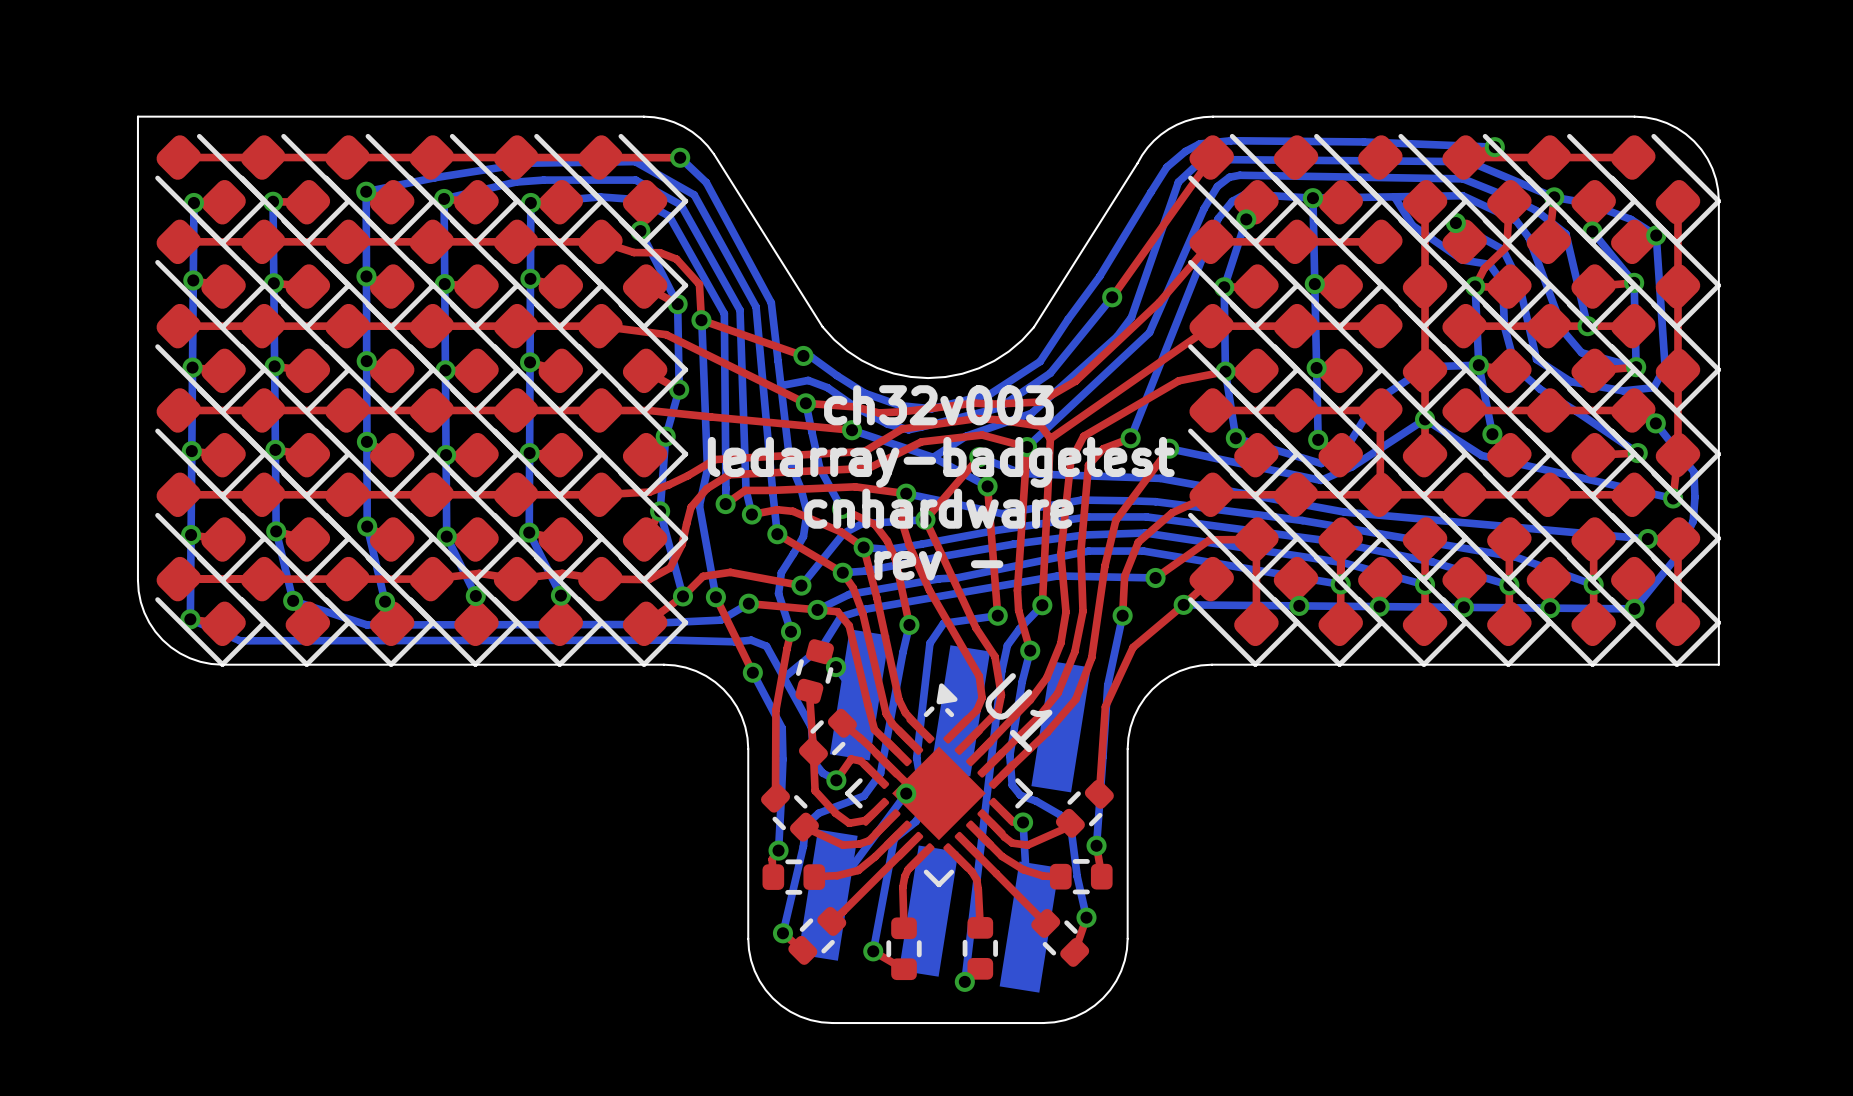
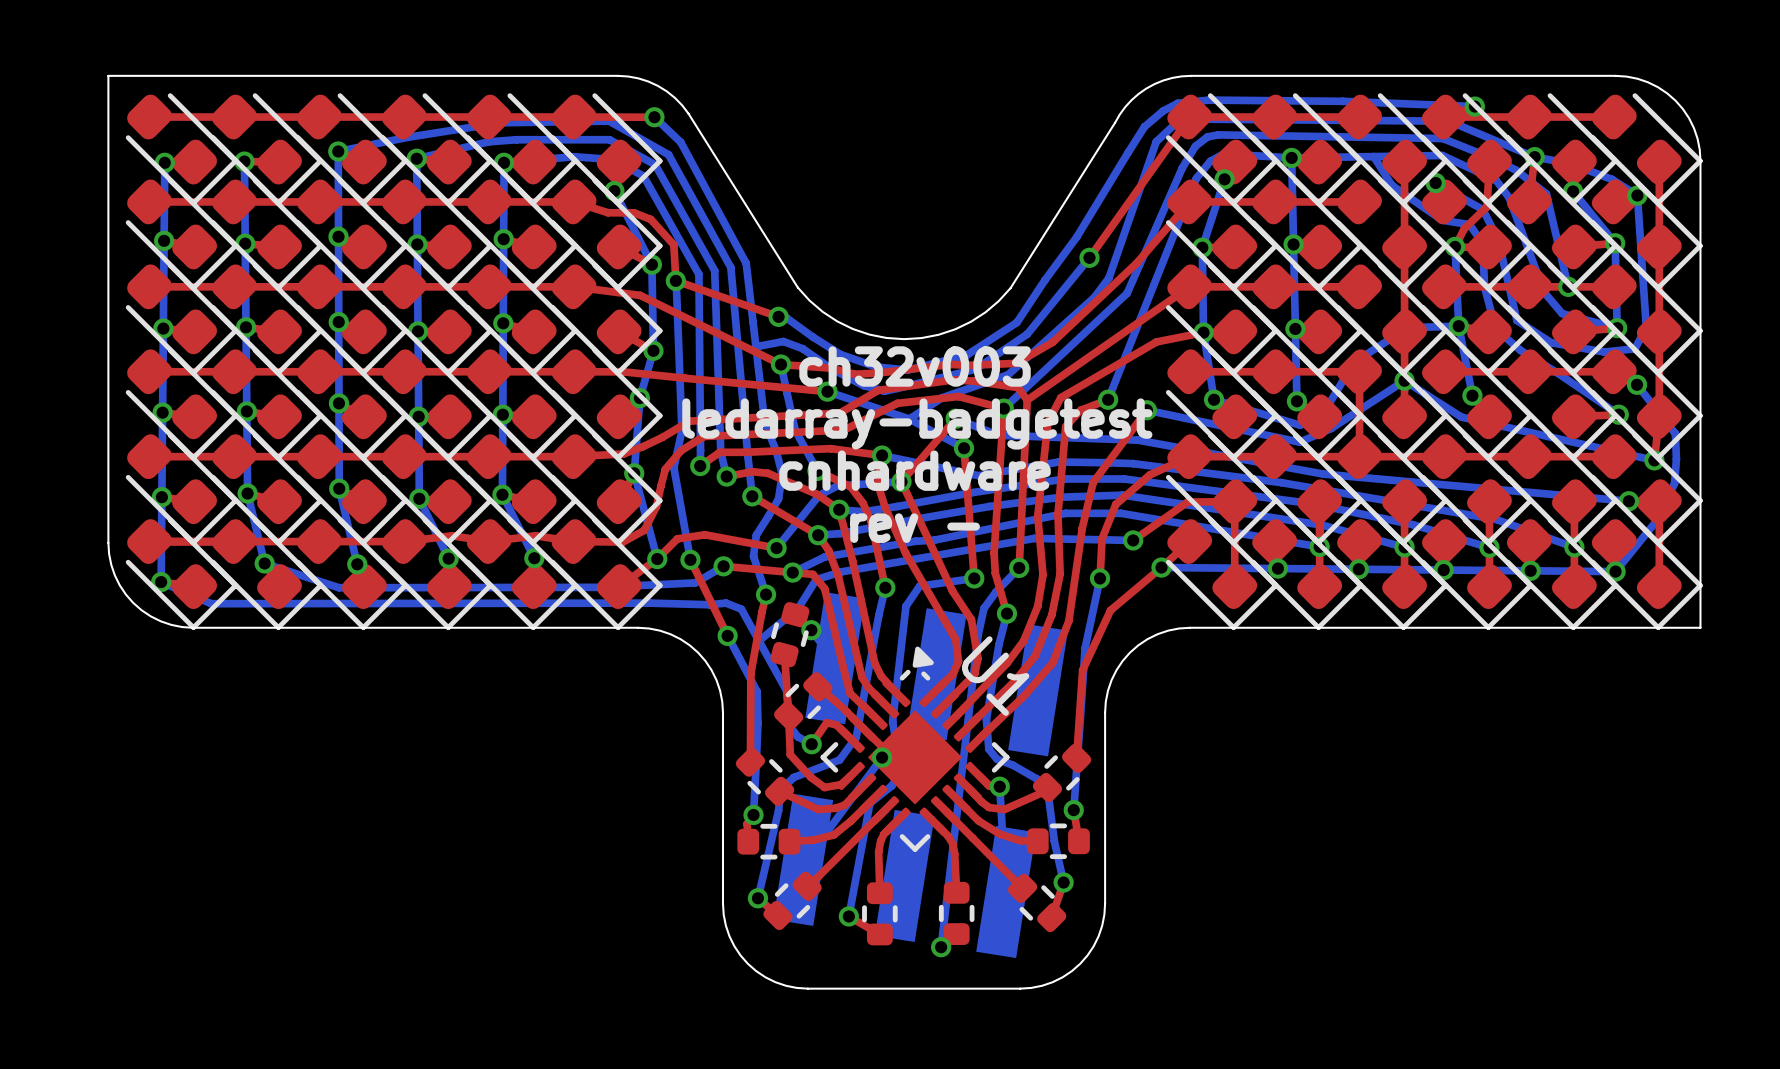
top track: none -> (1189, 117) (1359, 117)

